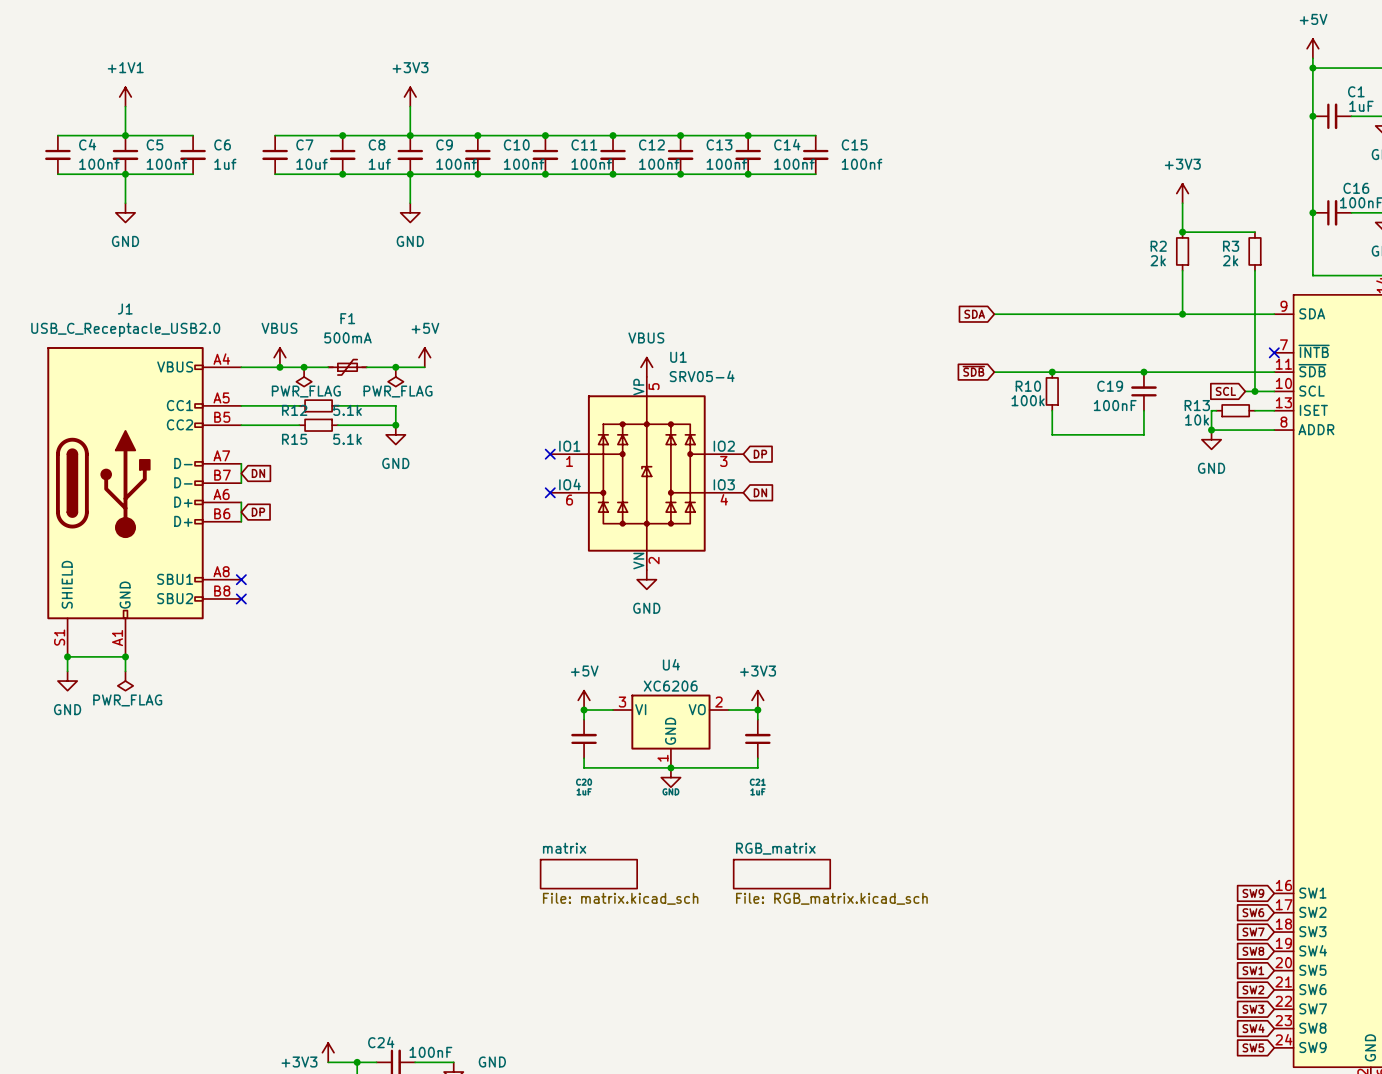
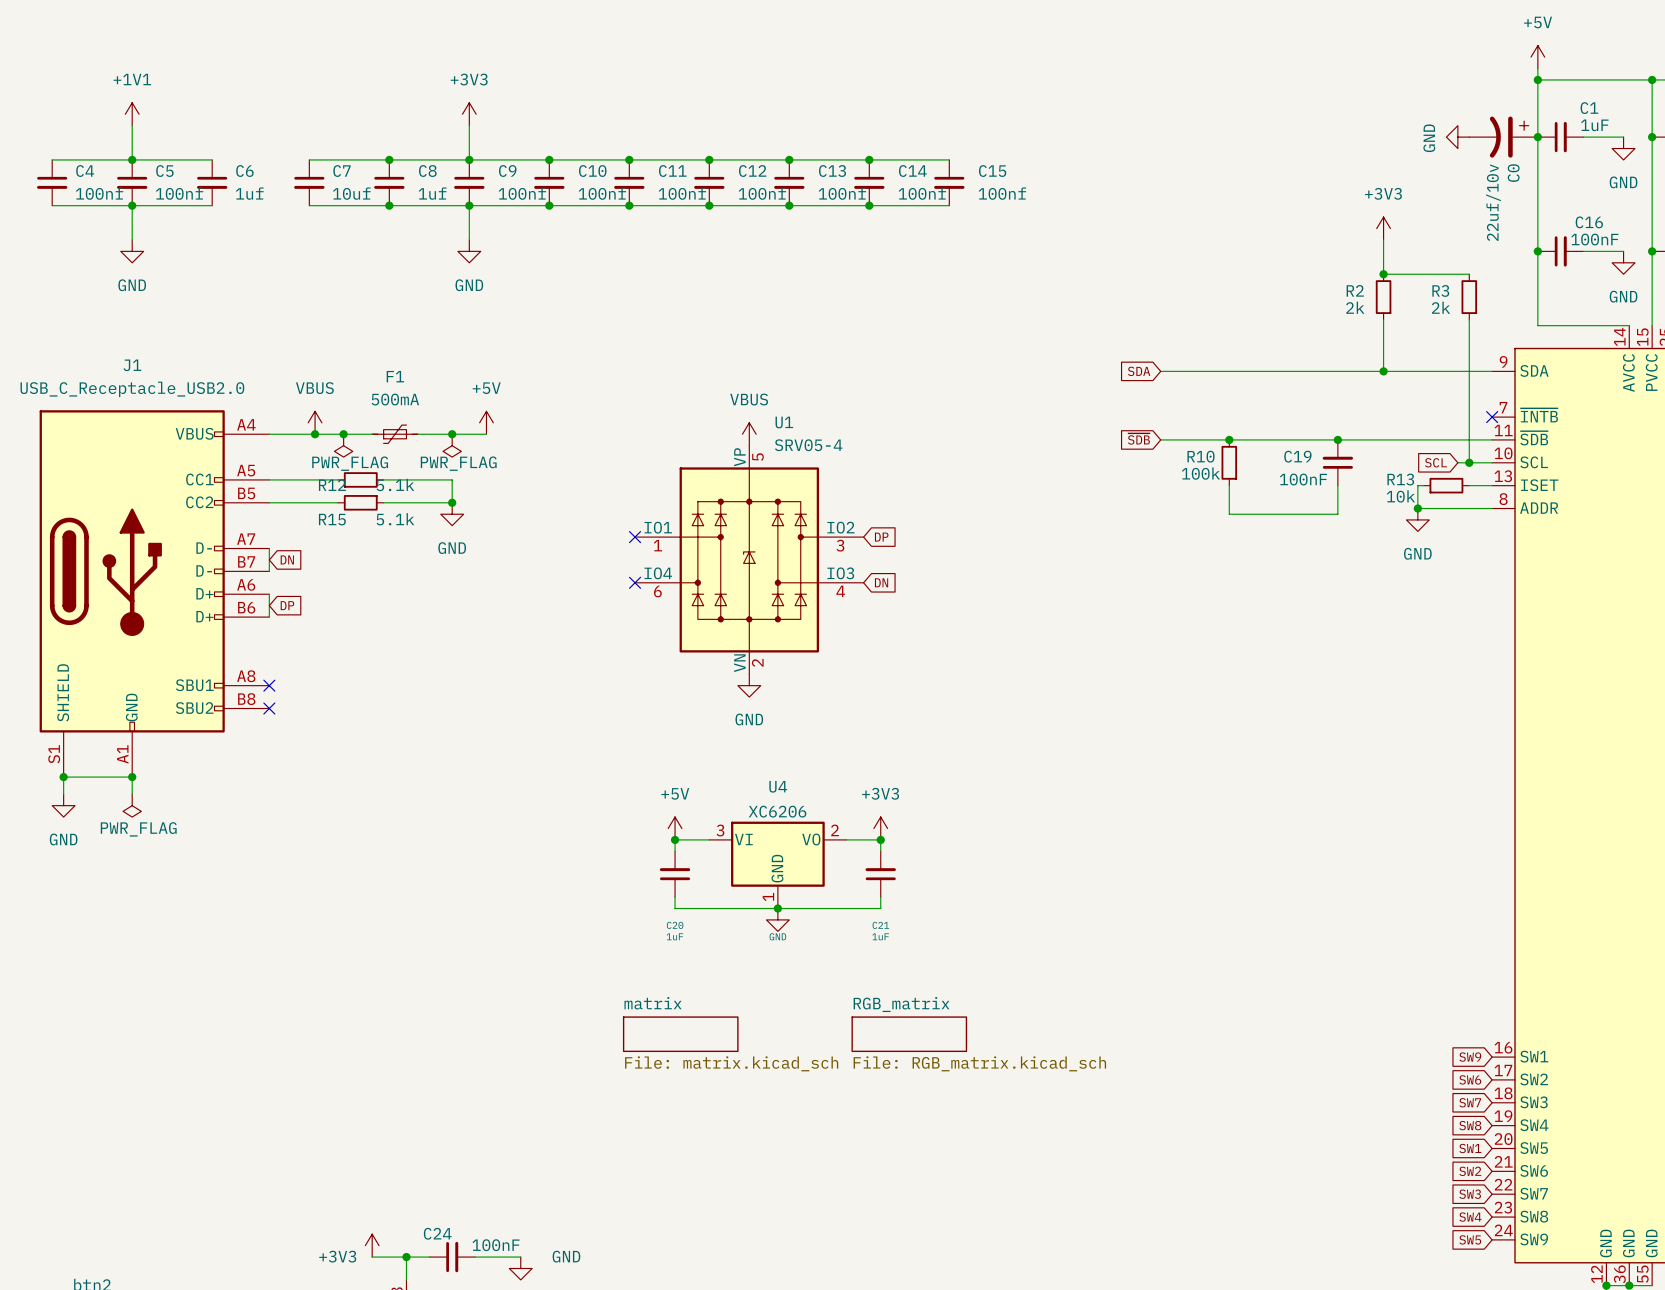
power symbol: none -> GND (1457, 137)
C0: none -> 22uf/10v (1503, 137)

